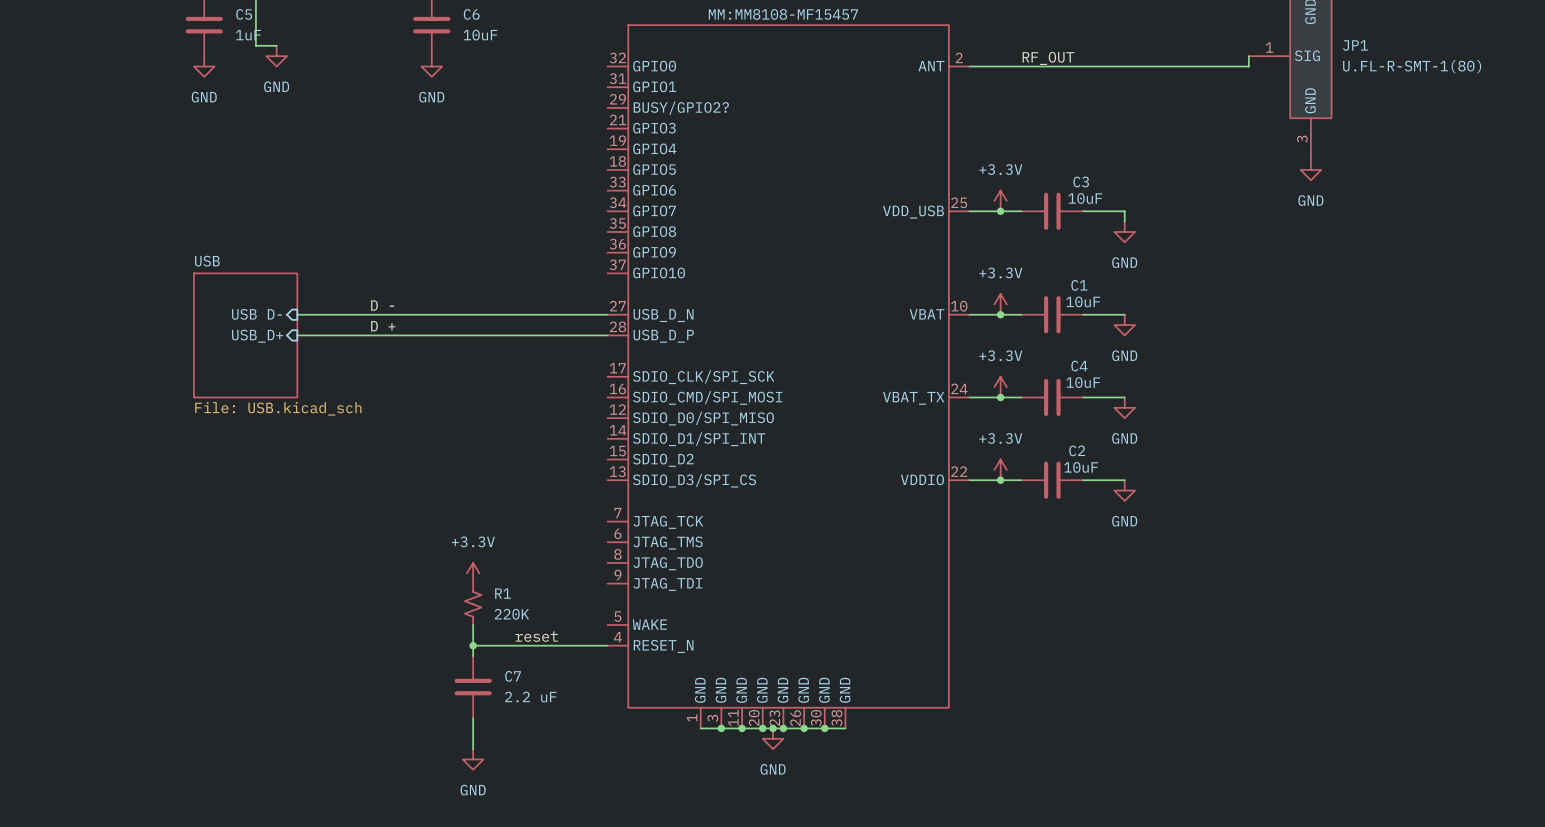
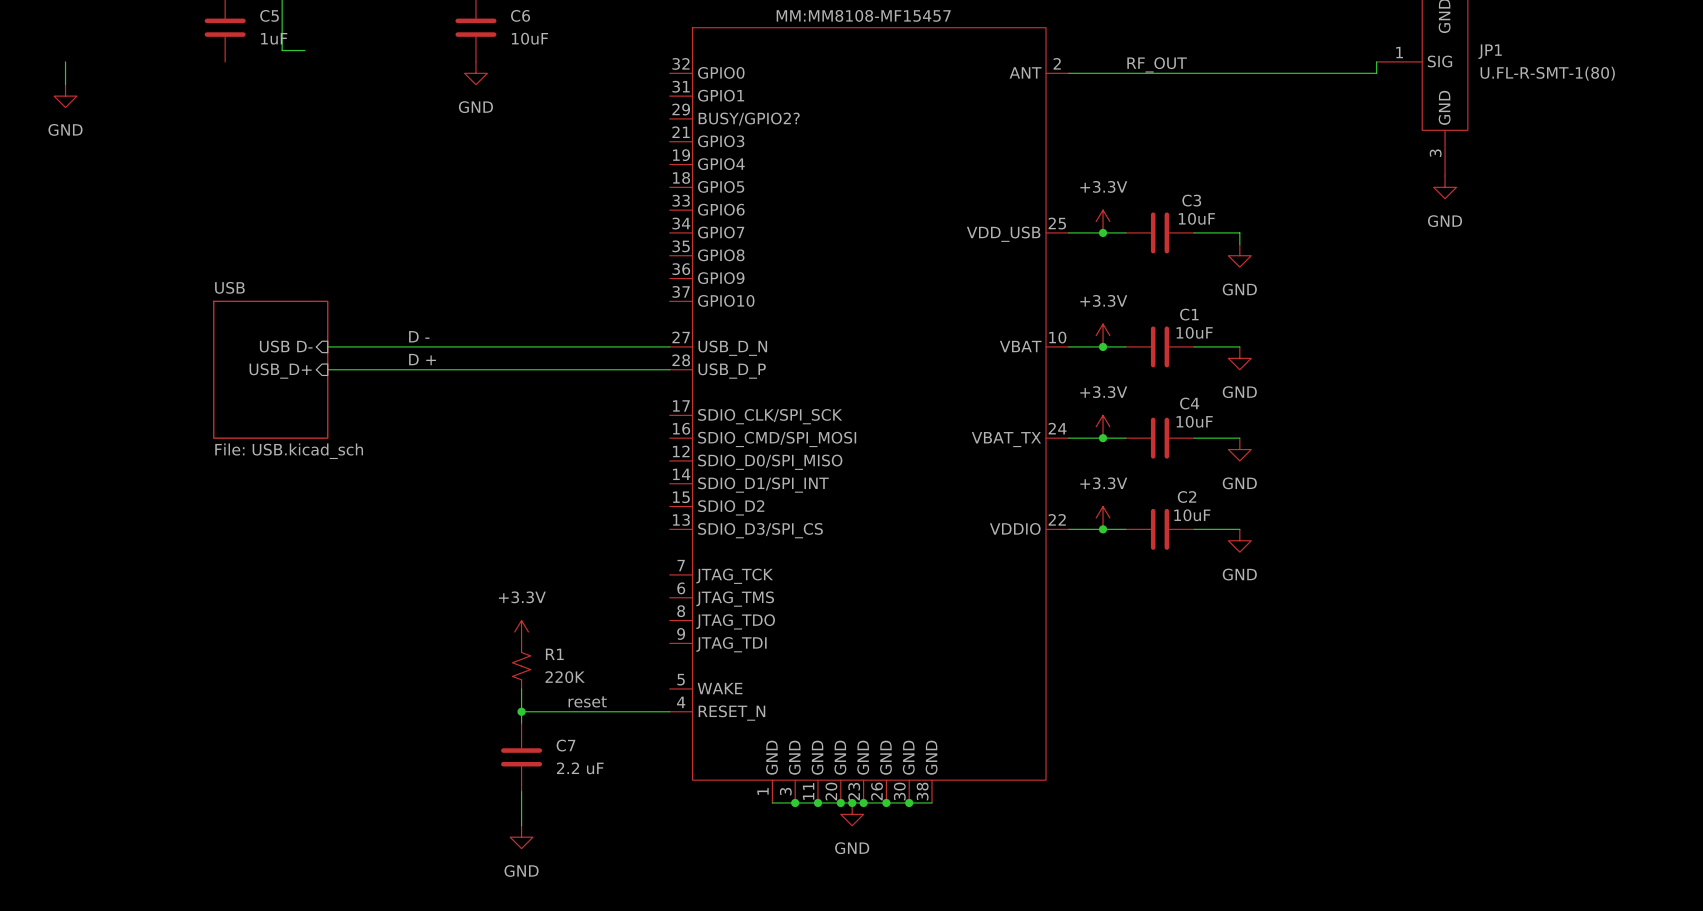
wire: none -> (65, 61) (65, 84)
power symbol: GND (276, 56) -> none
power symbol: GND (204, 66) -> none
power symbol: none -> GND (65, 96)

